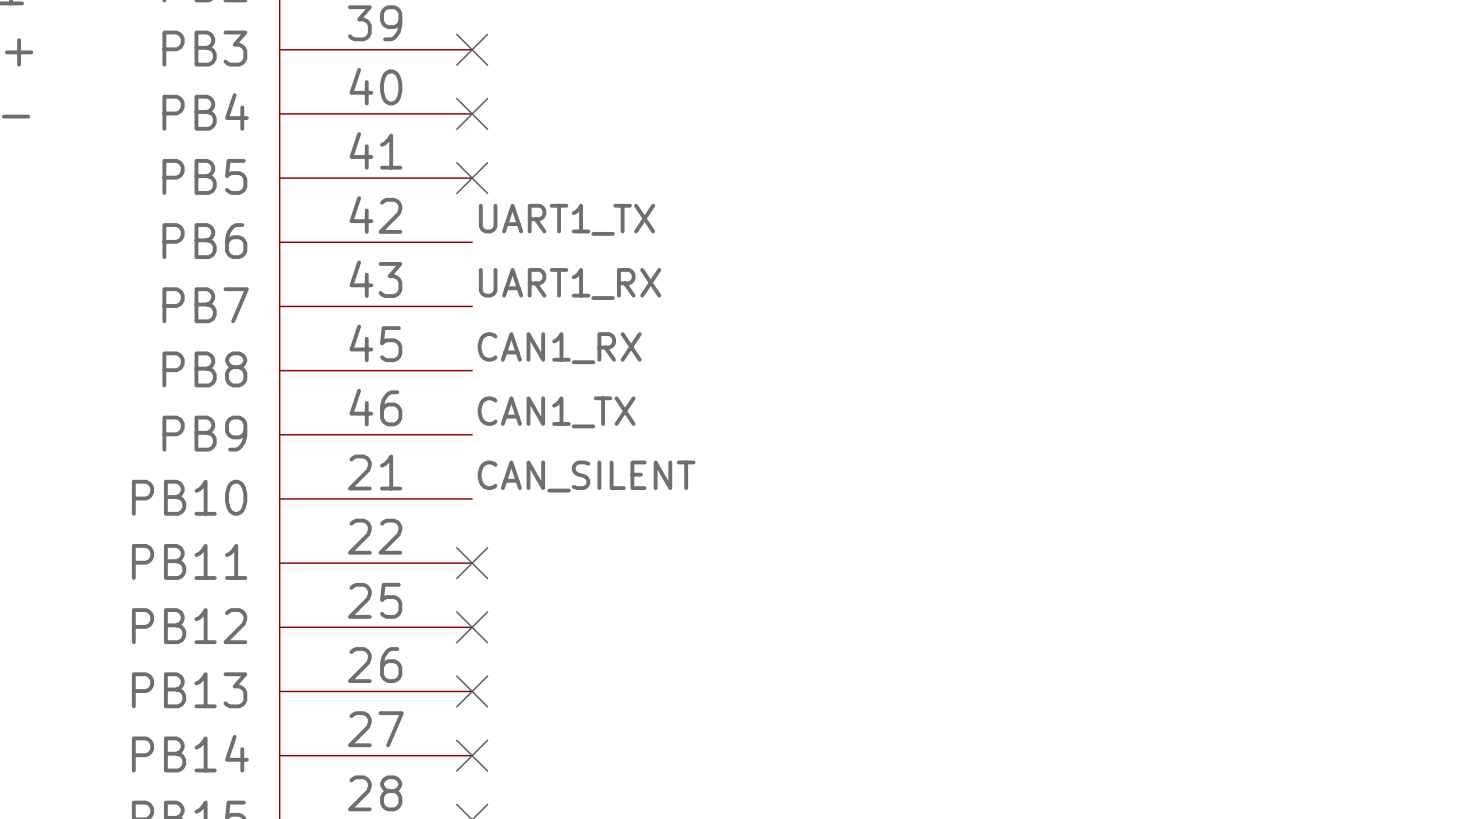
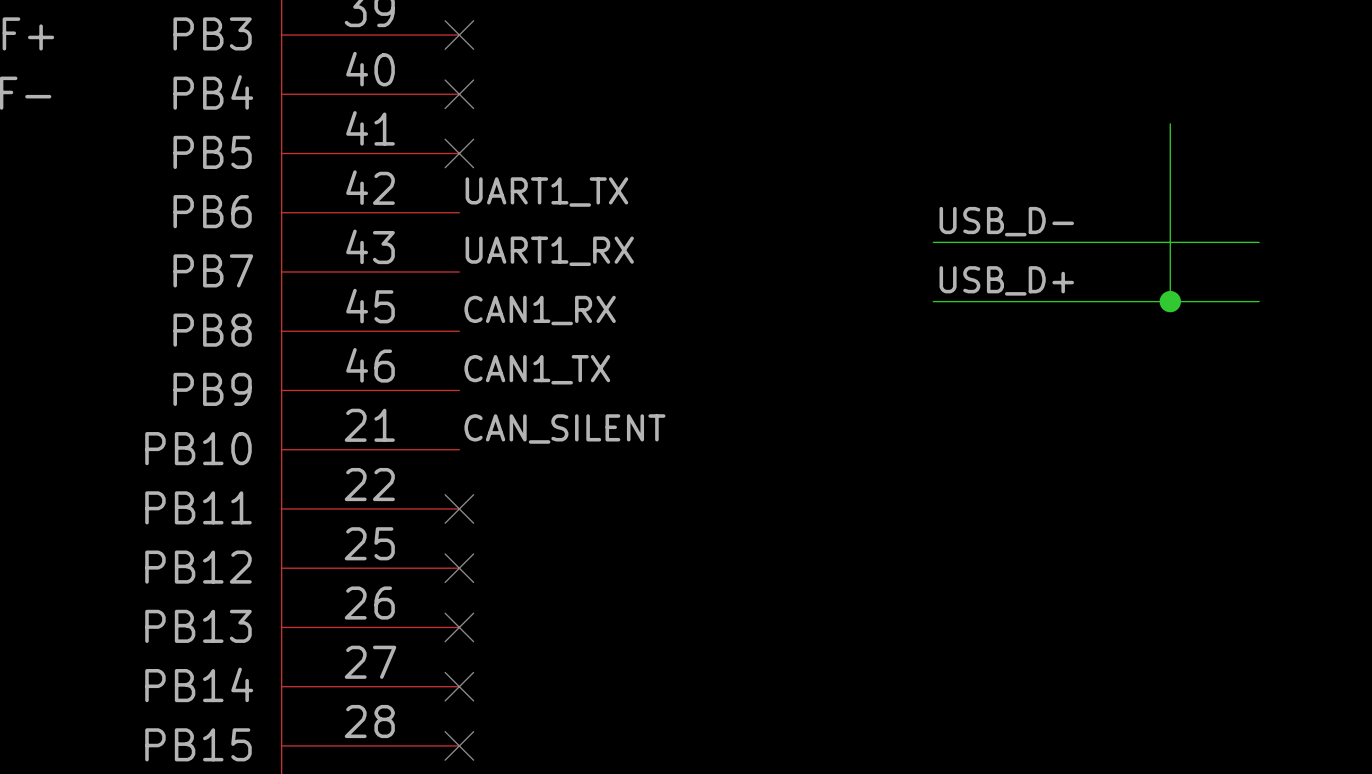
wire: none -> (1170, 123) (1170, 301)
label: none -> USB_D- (1006, 221)
wire: none -> (933, 242) (1259, 242)
label: none -> USB_D+ (1006, 280)
wire: none -> (933, 301) (1259, 301)
junction: none -> (1170, 301)

